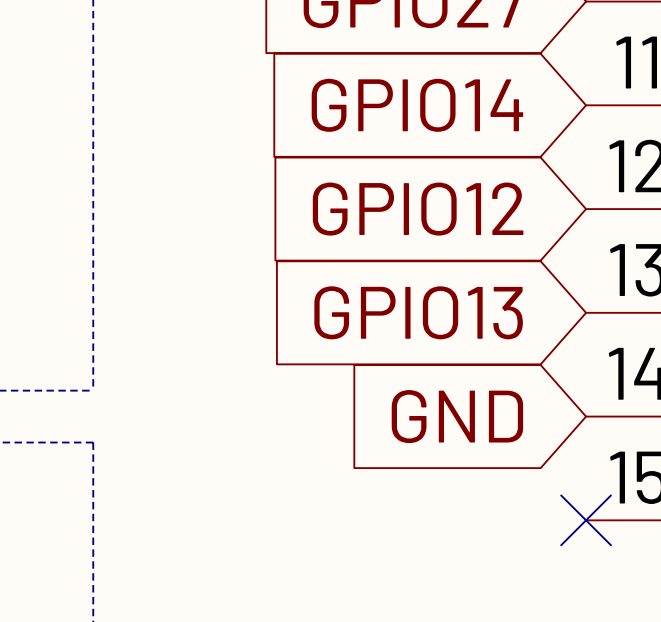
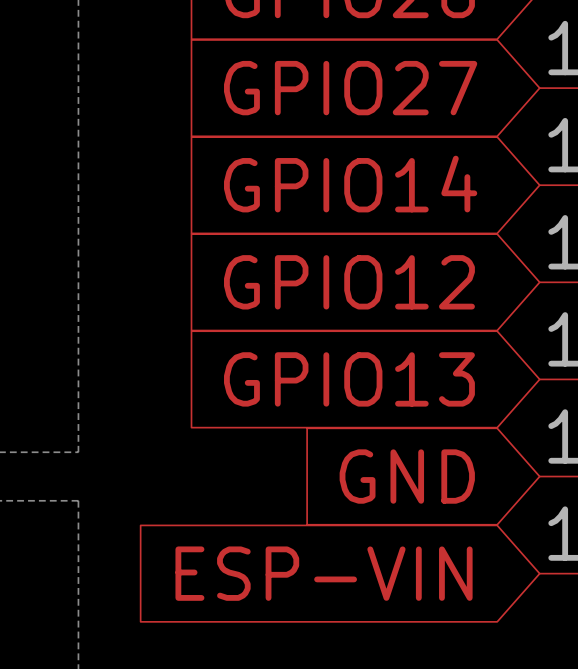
global label: none -> ESP-VIN (324, 573)
no-connect mark: (586, 520) -> none

